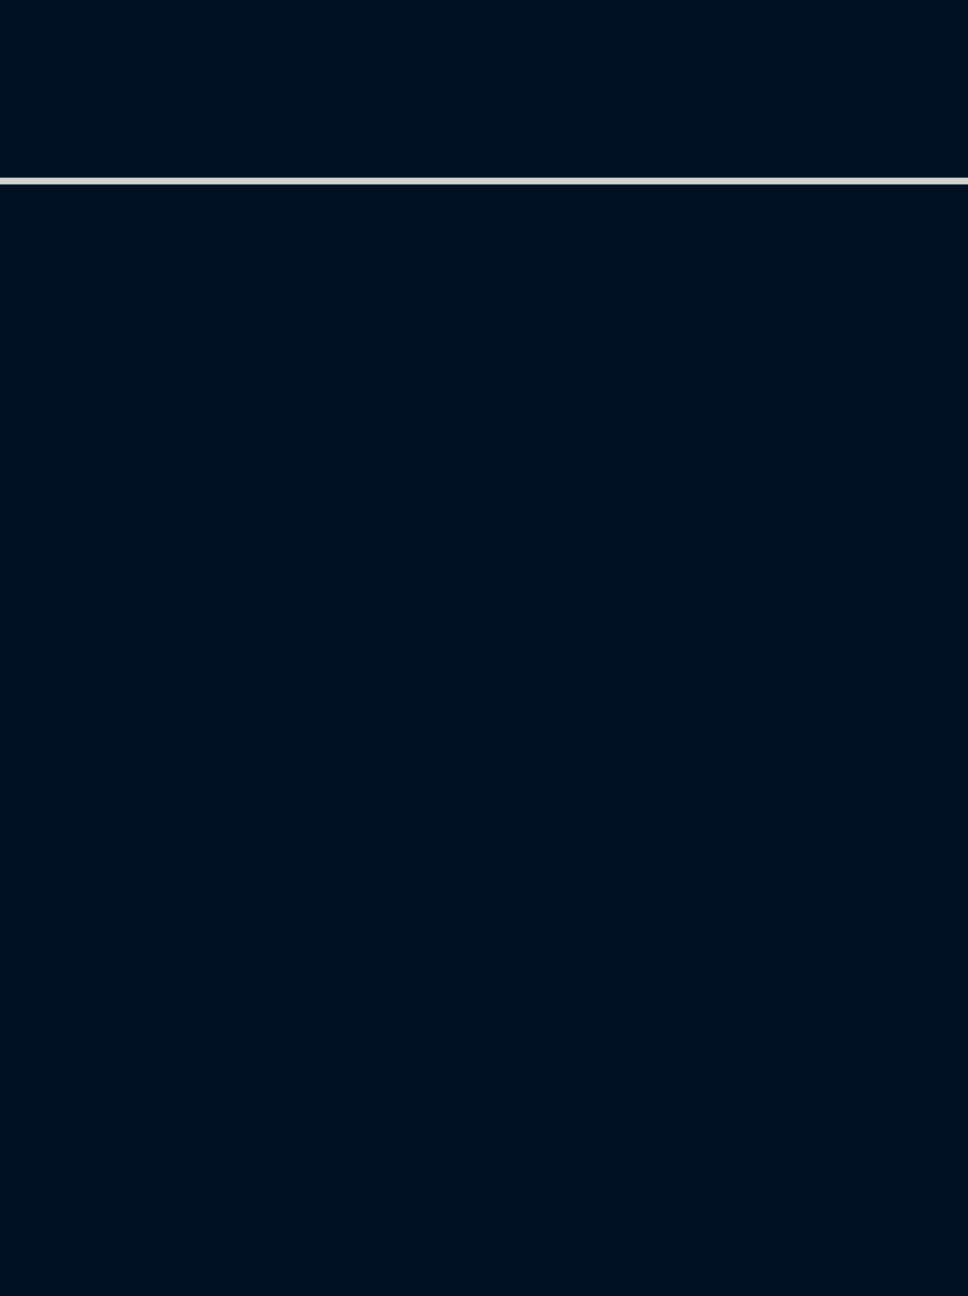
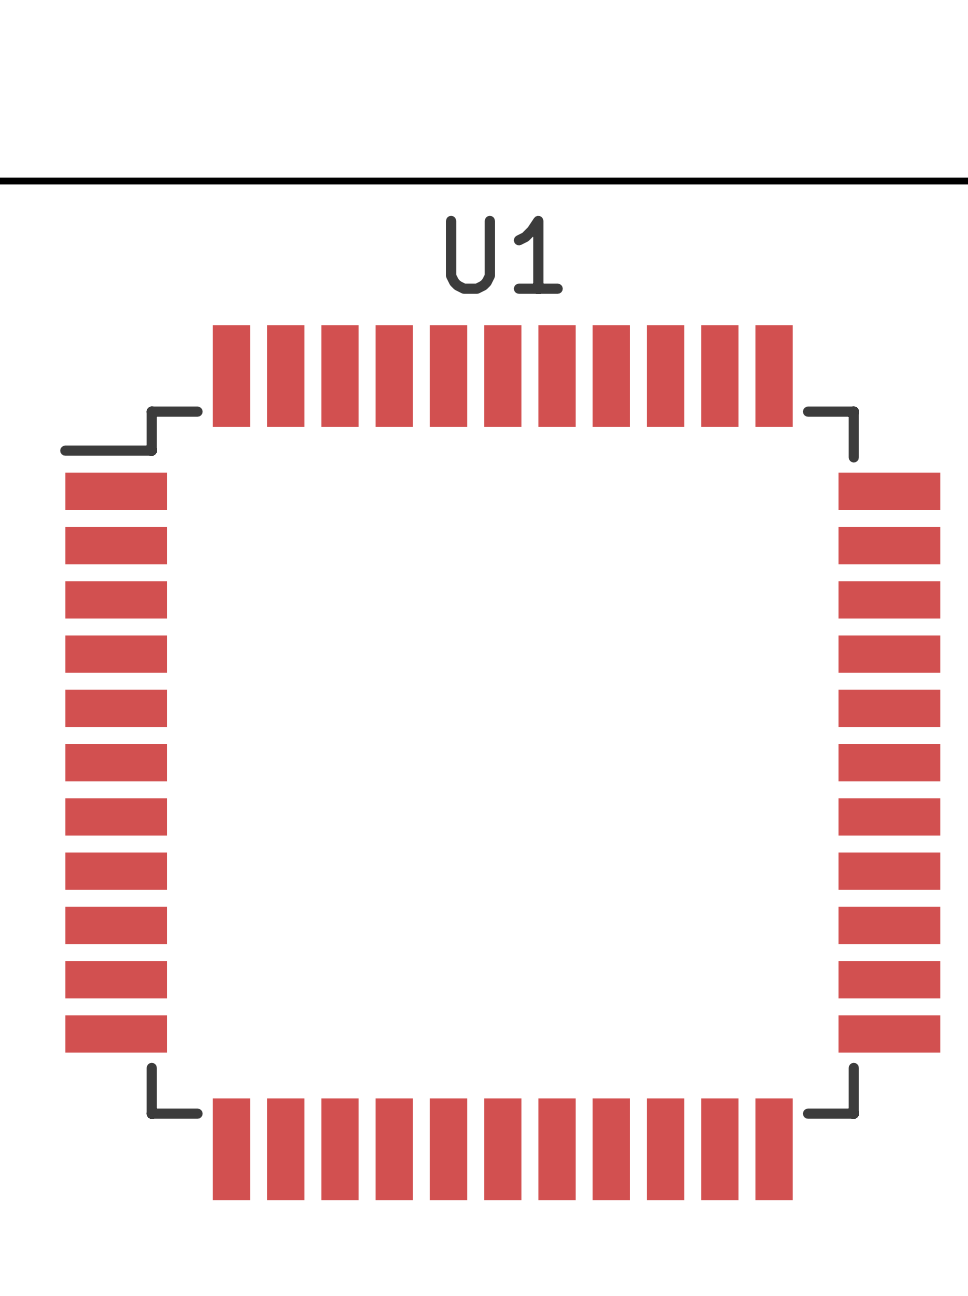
U1: none -> (500, 762)

